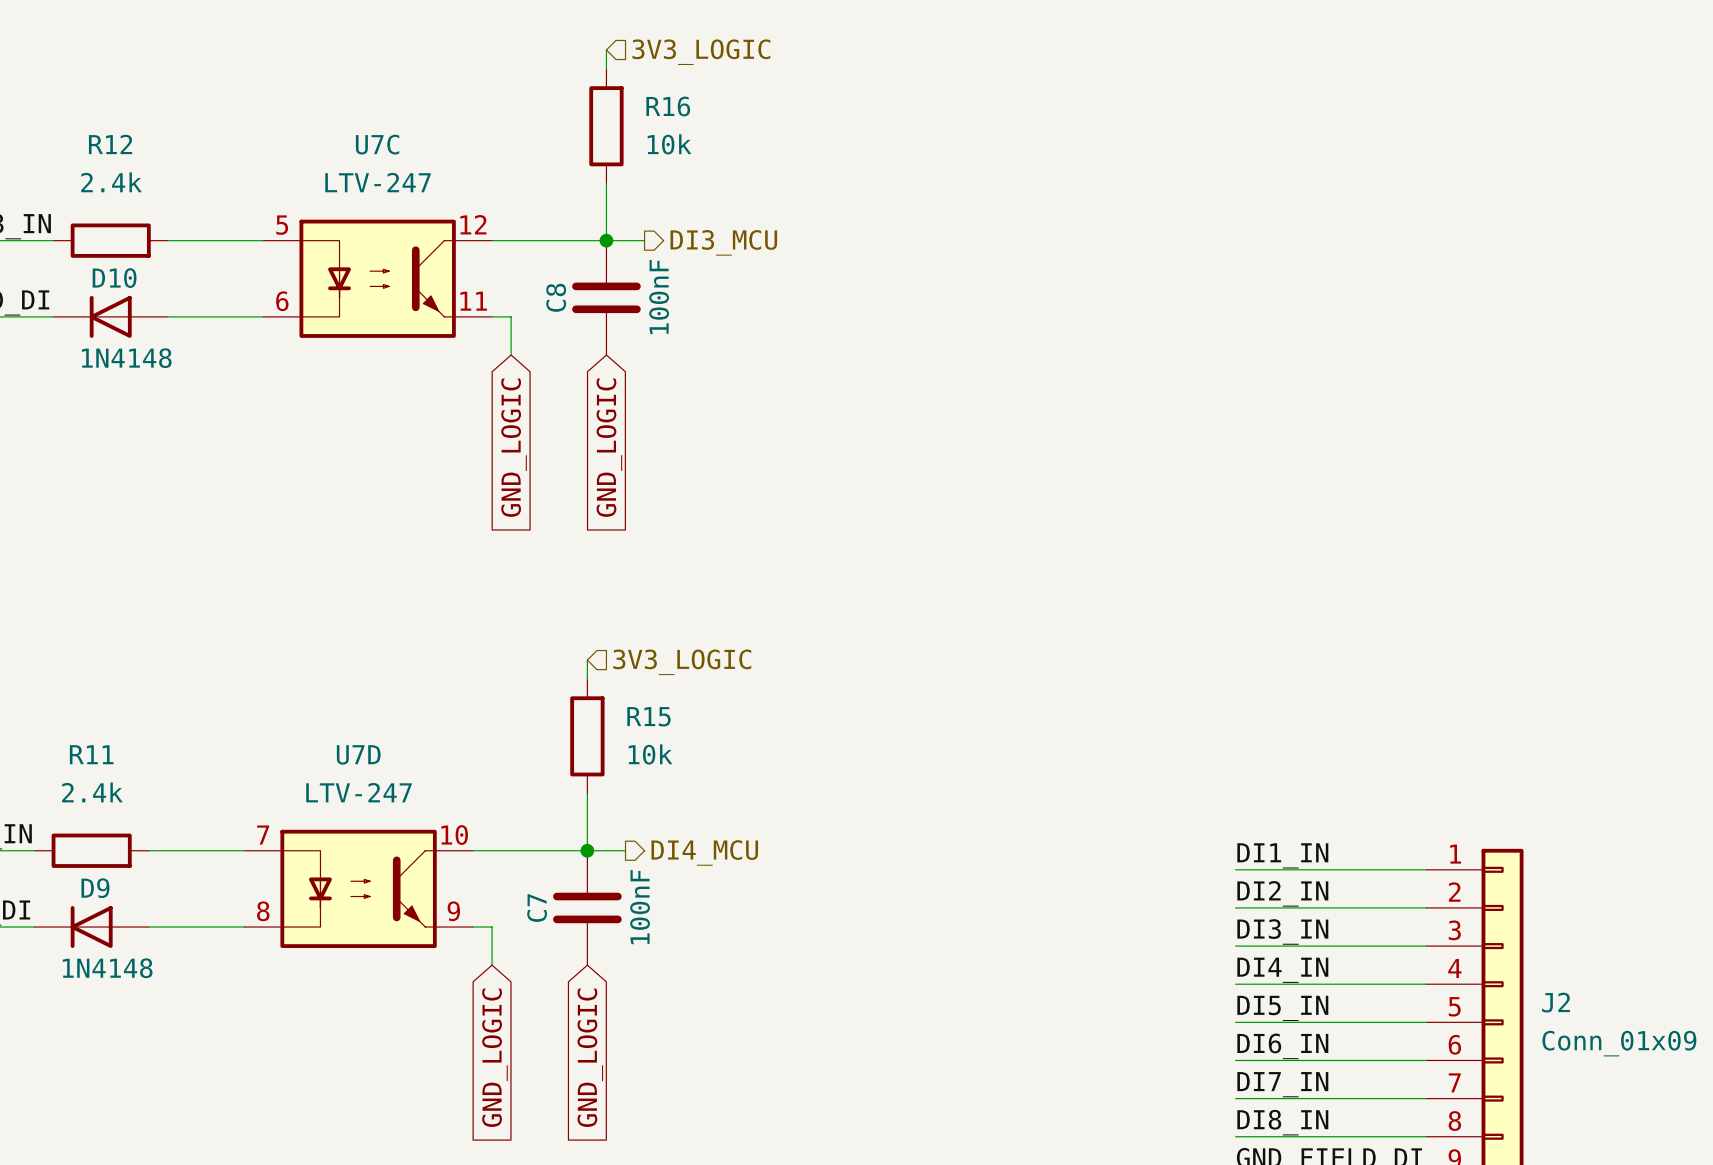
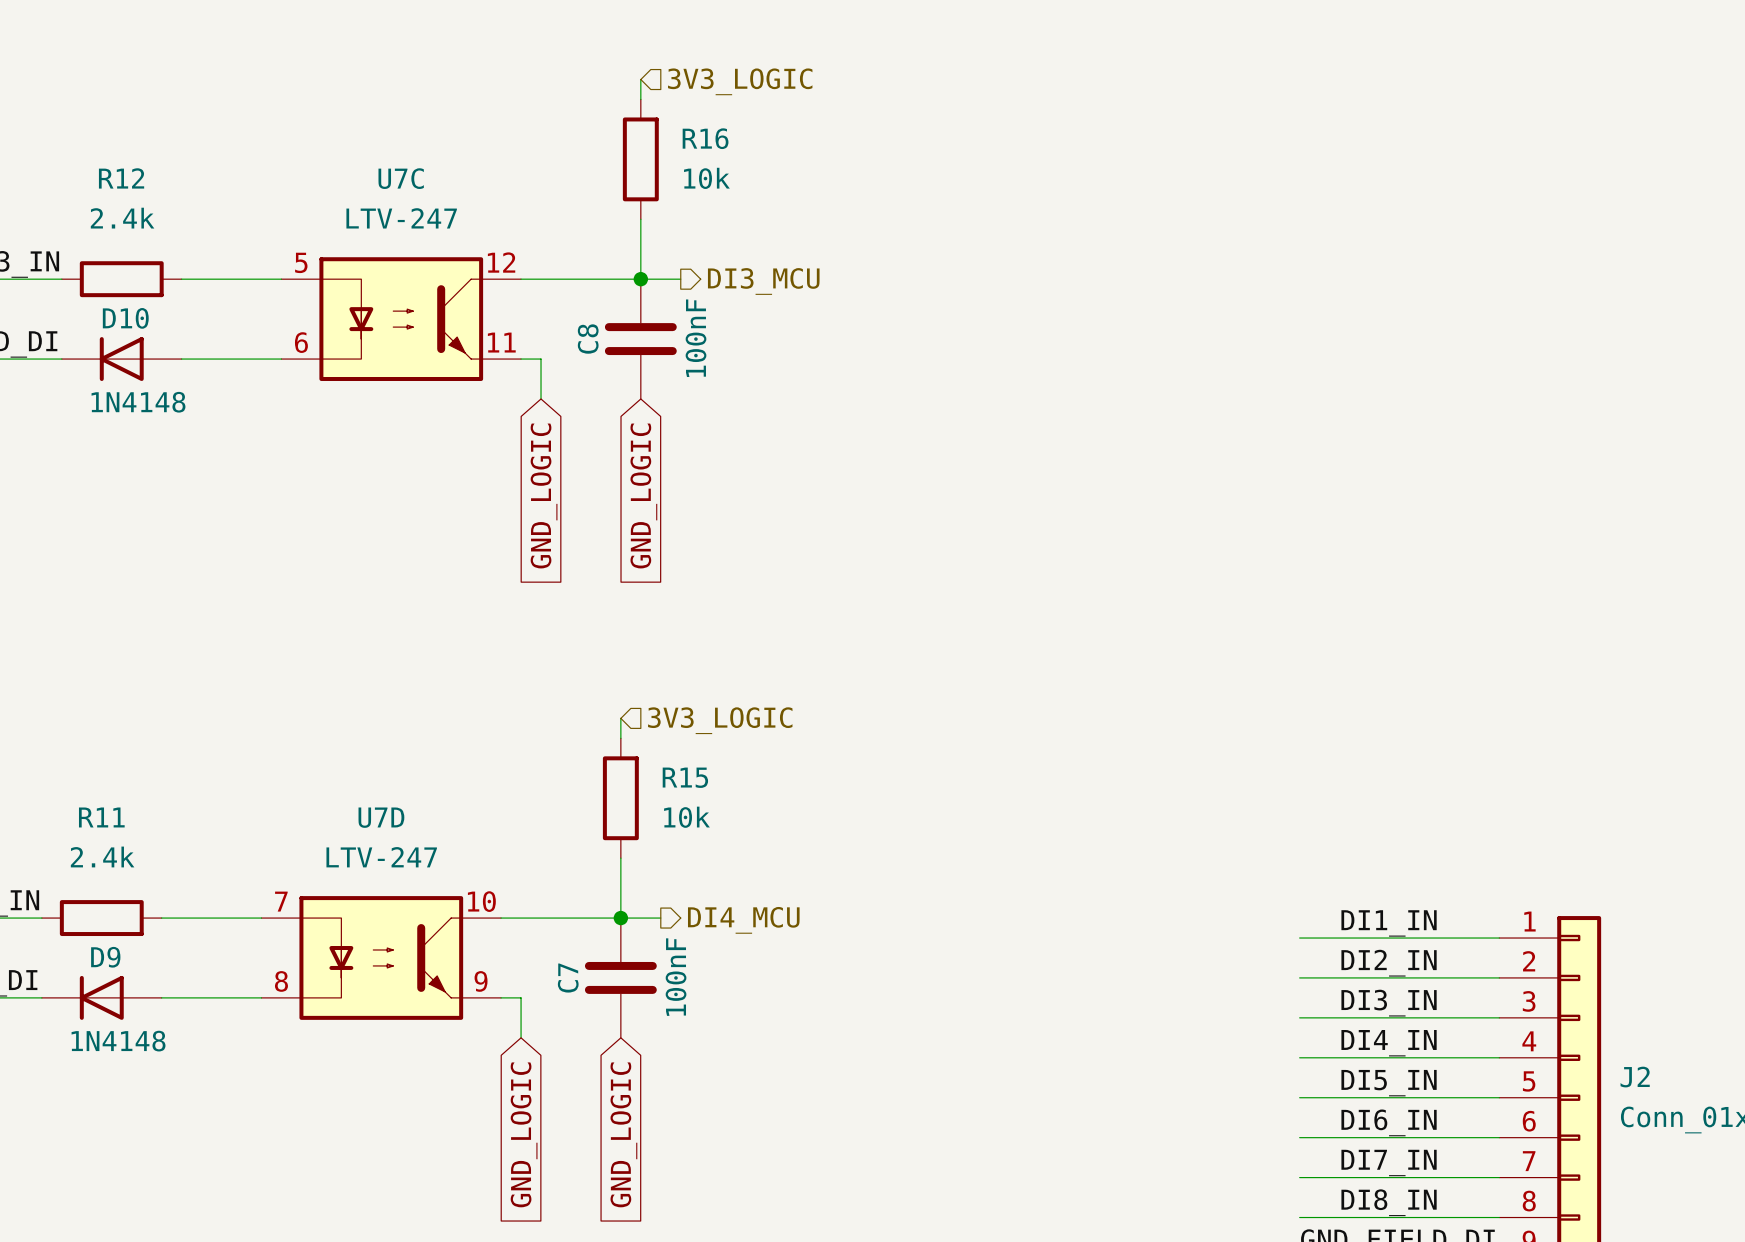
label position: DI1_IN (1282, 855) -> DI1_IN (1389, 923)
label position: DI2_IN (1282, 893) -> DI2_IN (1389, 963)
label position: DI3_IN (1282, 931) -> DI3_IN (1389, 1003)
label position: DI4_IN (1282, 970) -> DI4_IN (1389, 1043)
label position: DI5_IN (1282, 1008) -> DI5_IN (1389, 1083)
label position: DI6_IN (1282, 1046) -> DI6_IN (1389, 1122)
label position: DI7_IN (1282, 1084) -> DI7_IN (1389, 1163)
label position: DI8_IN (1282, 1122) -> DI8_IN (1389, 1202)

